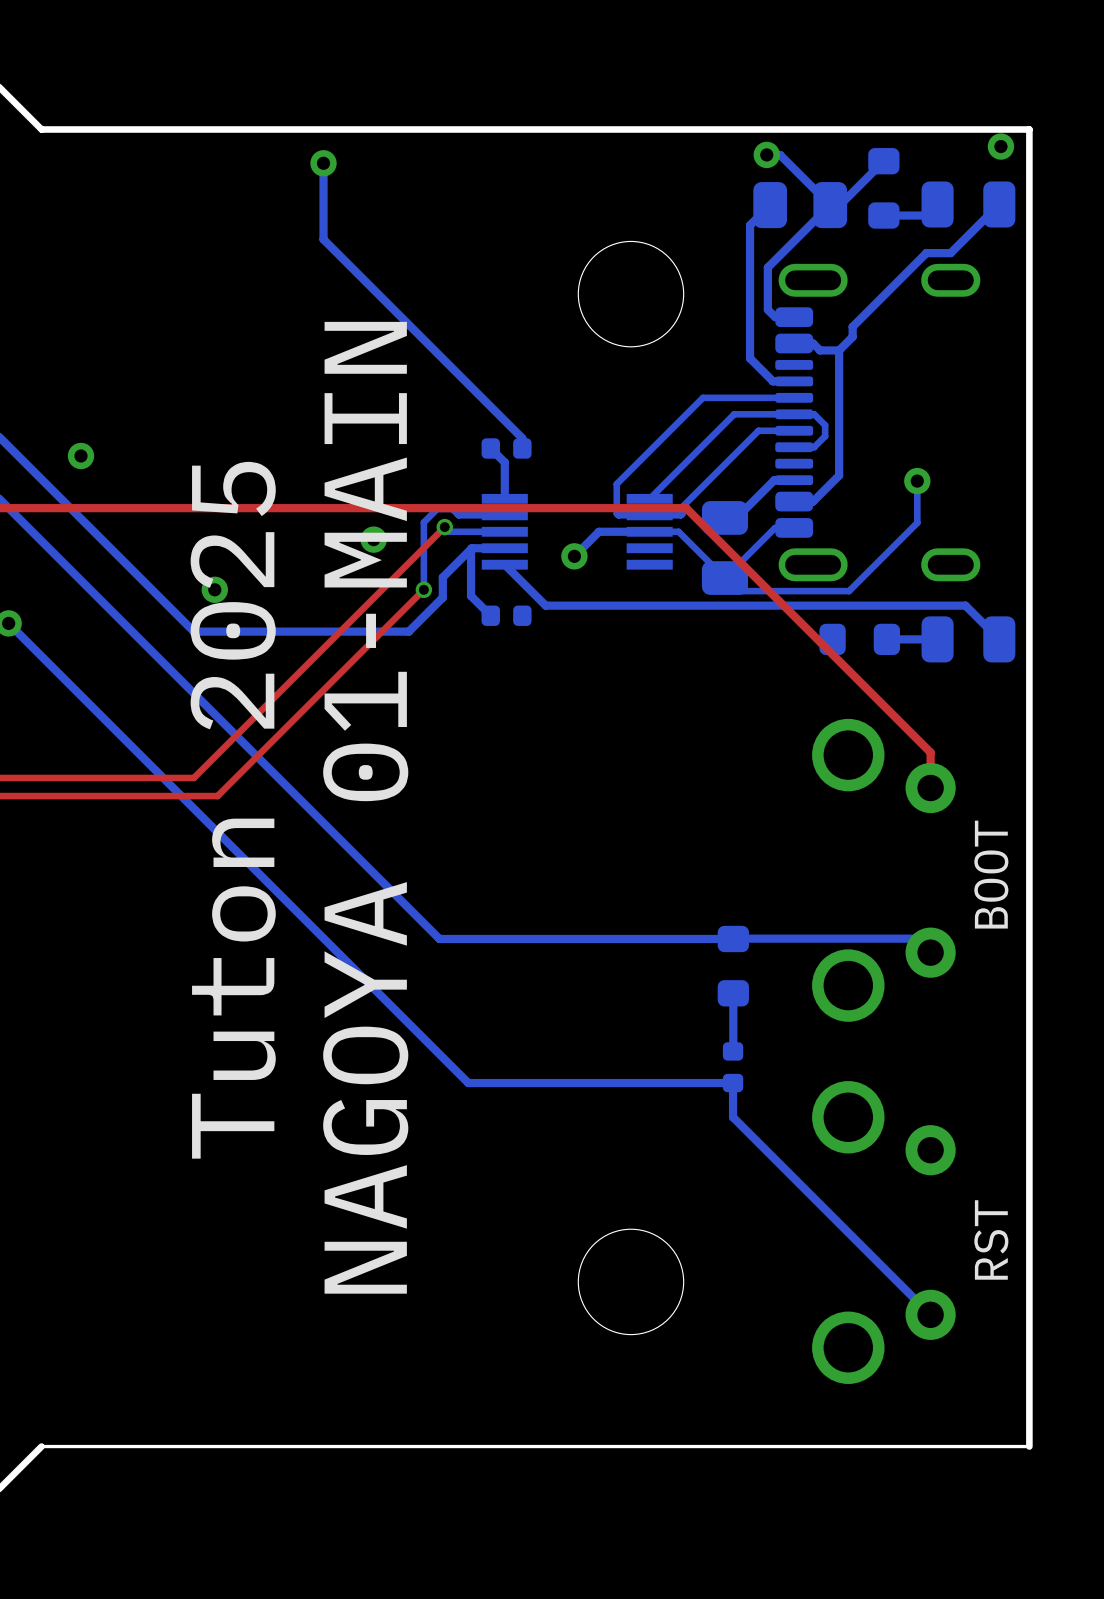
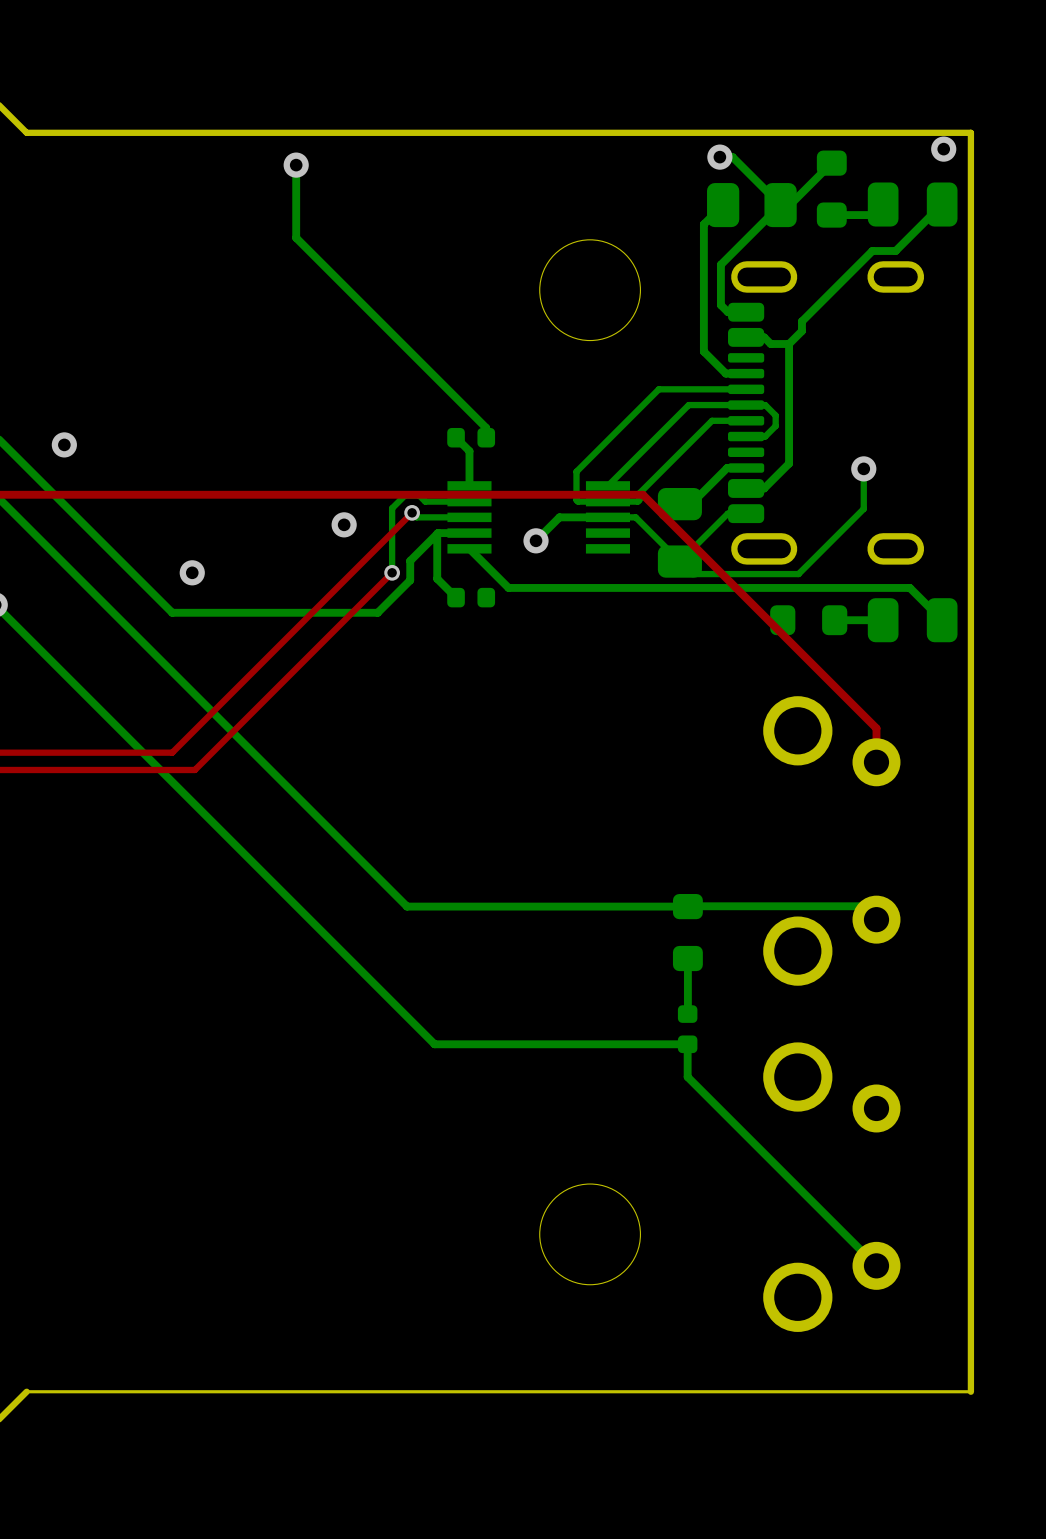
text: NAGOYA 01-MAIN (365, 807) -> none
text: Tuton 2025 (233, 810) -> none
text: BOOT (991, 874) -> none
text: RST (991, 1239) -> none

